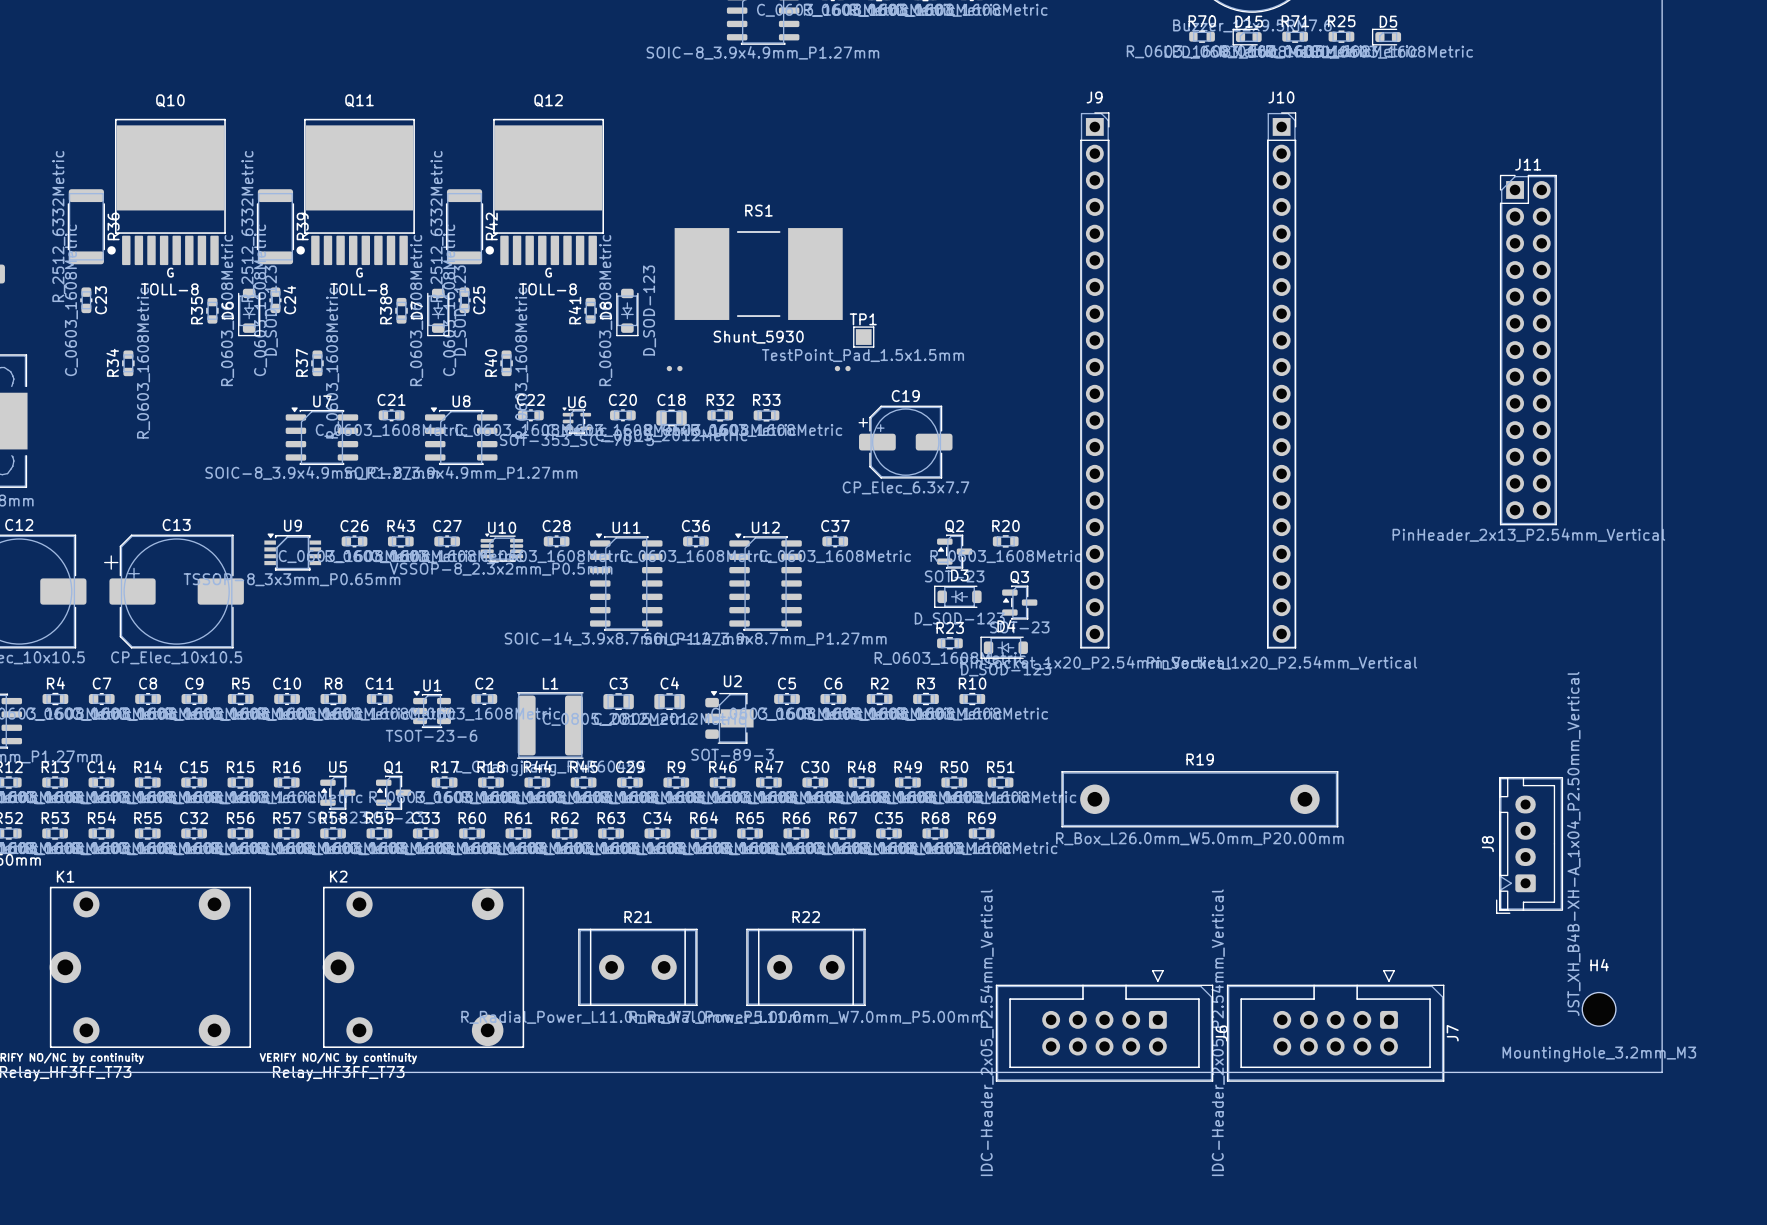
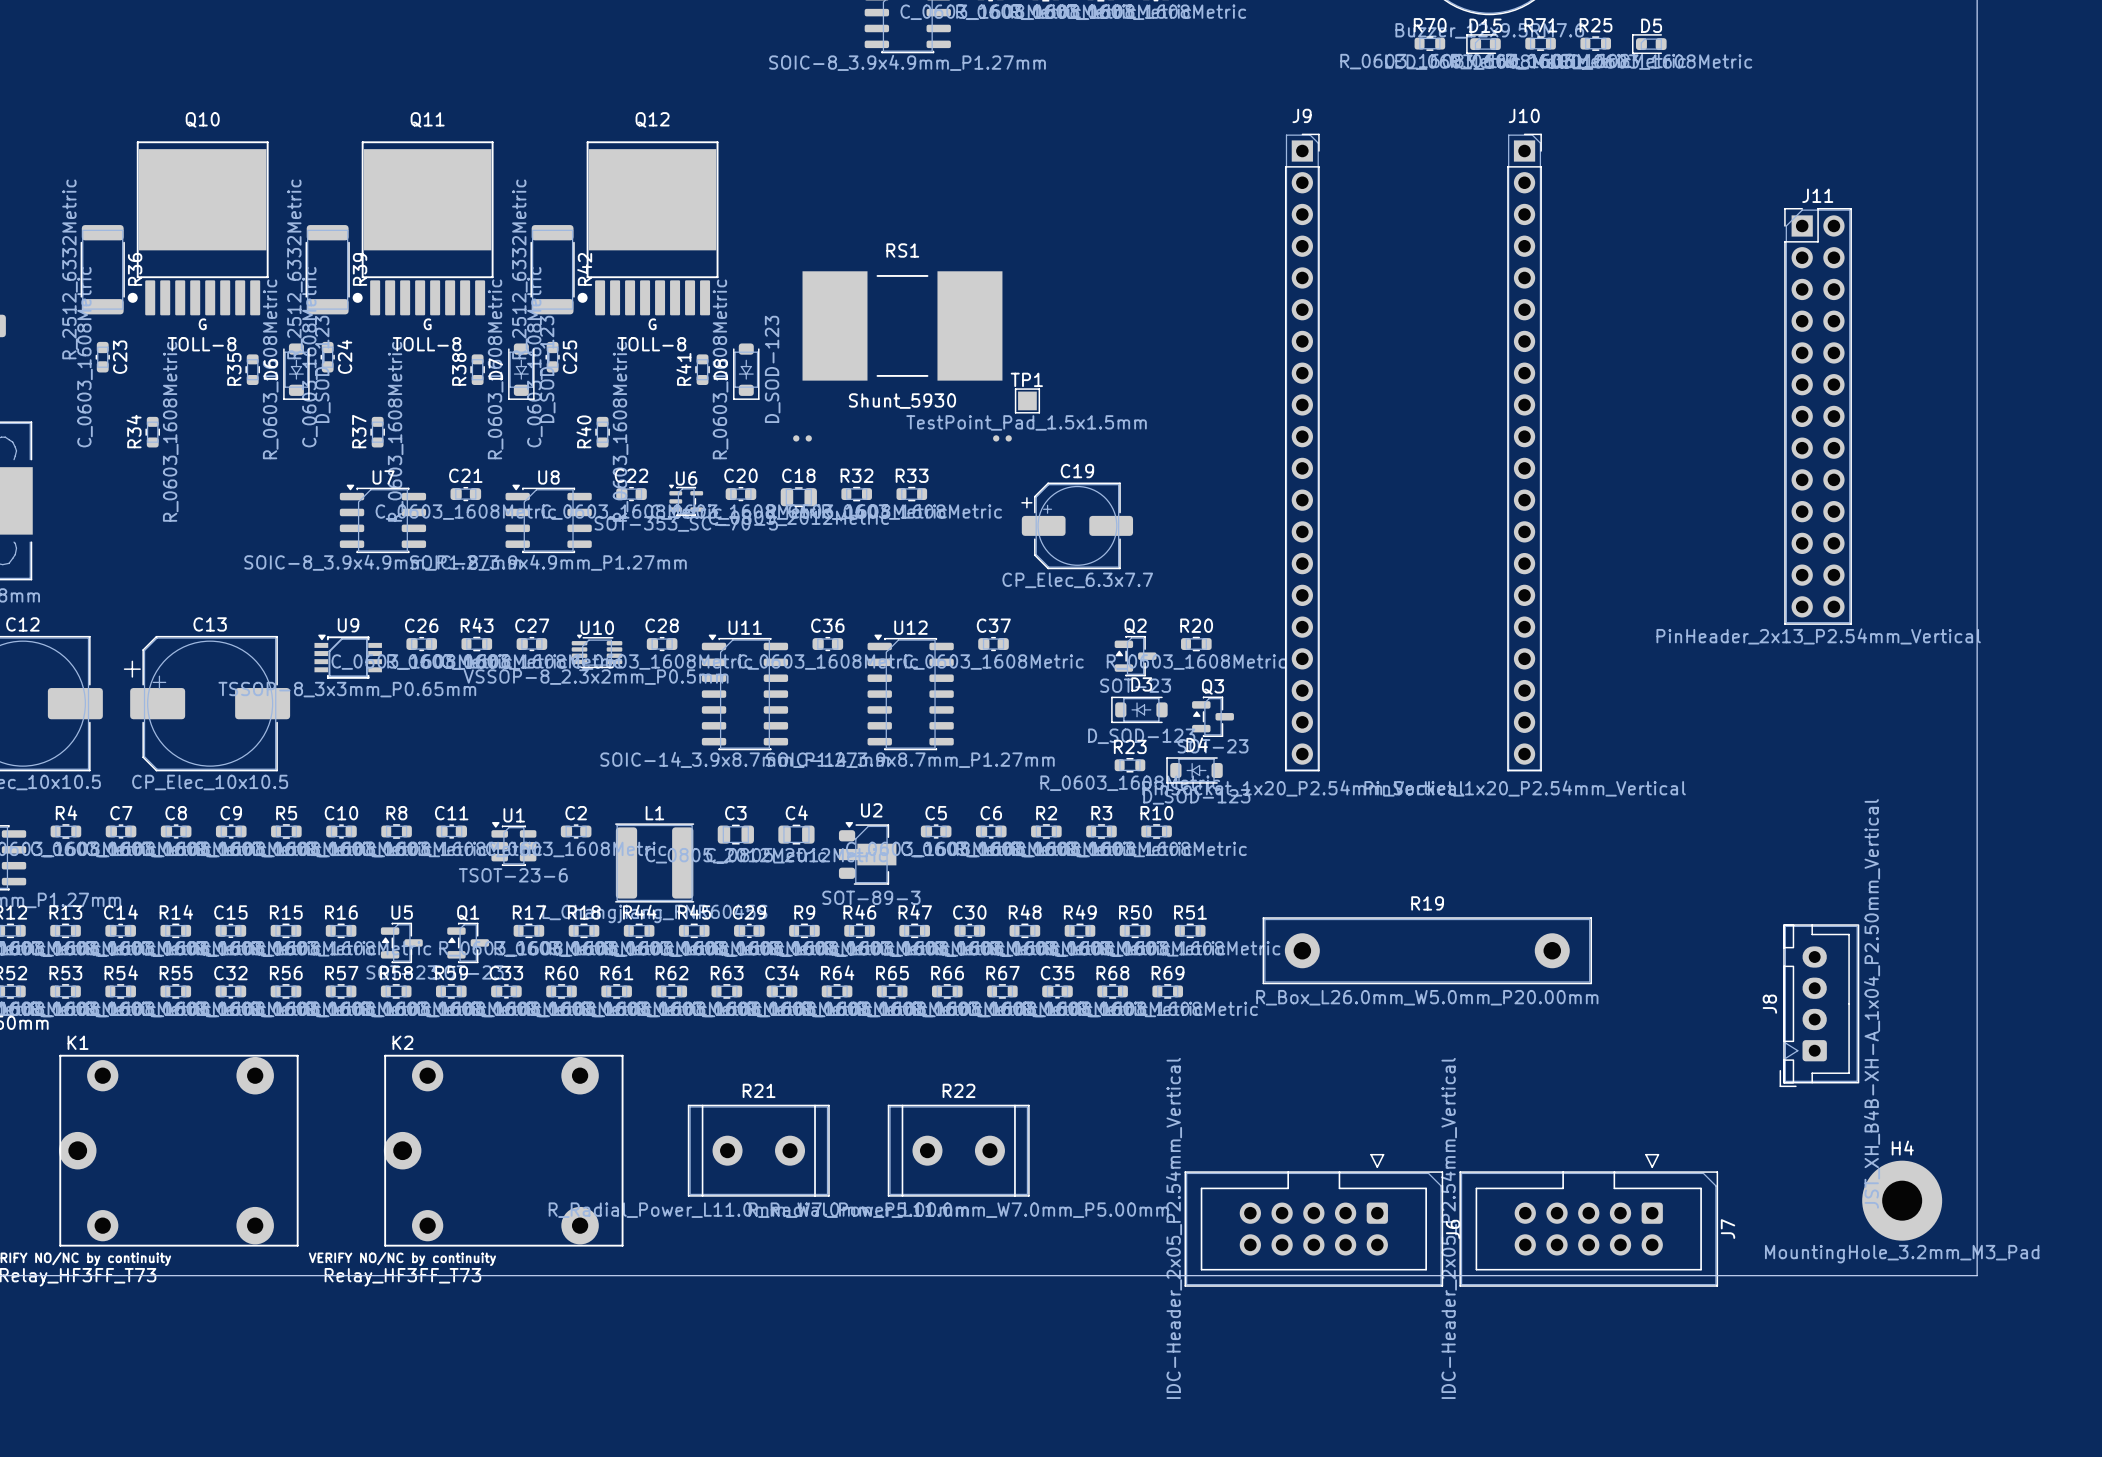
H4 footprint: [1582, 992, 1616, 1027] -> [1862, 1160, 1943, 1241]
H4 value: MountingHole_3.2mm_M3 (1599, 1054) -> MountingHole_3.2mm_M3_Pad (1902, 1254)

